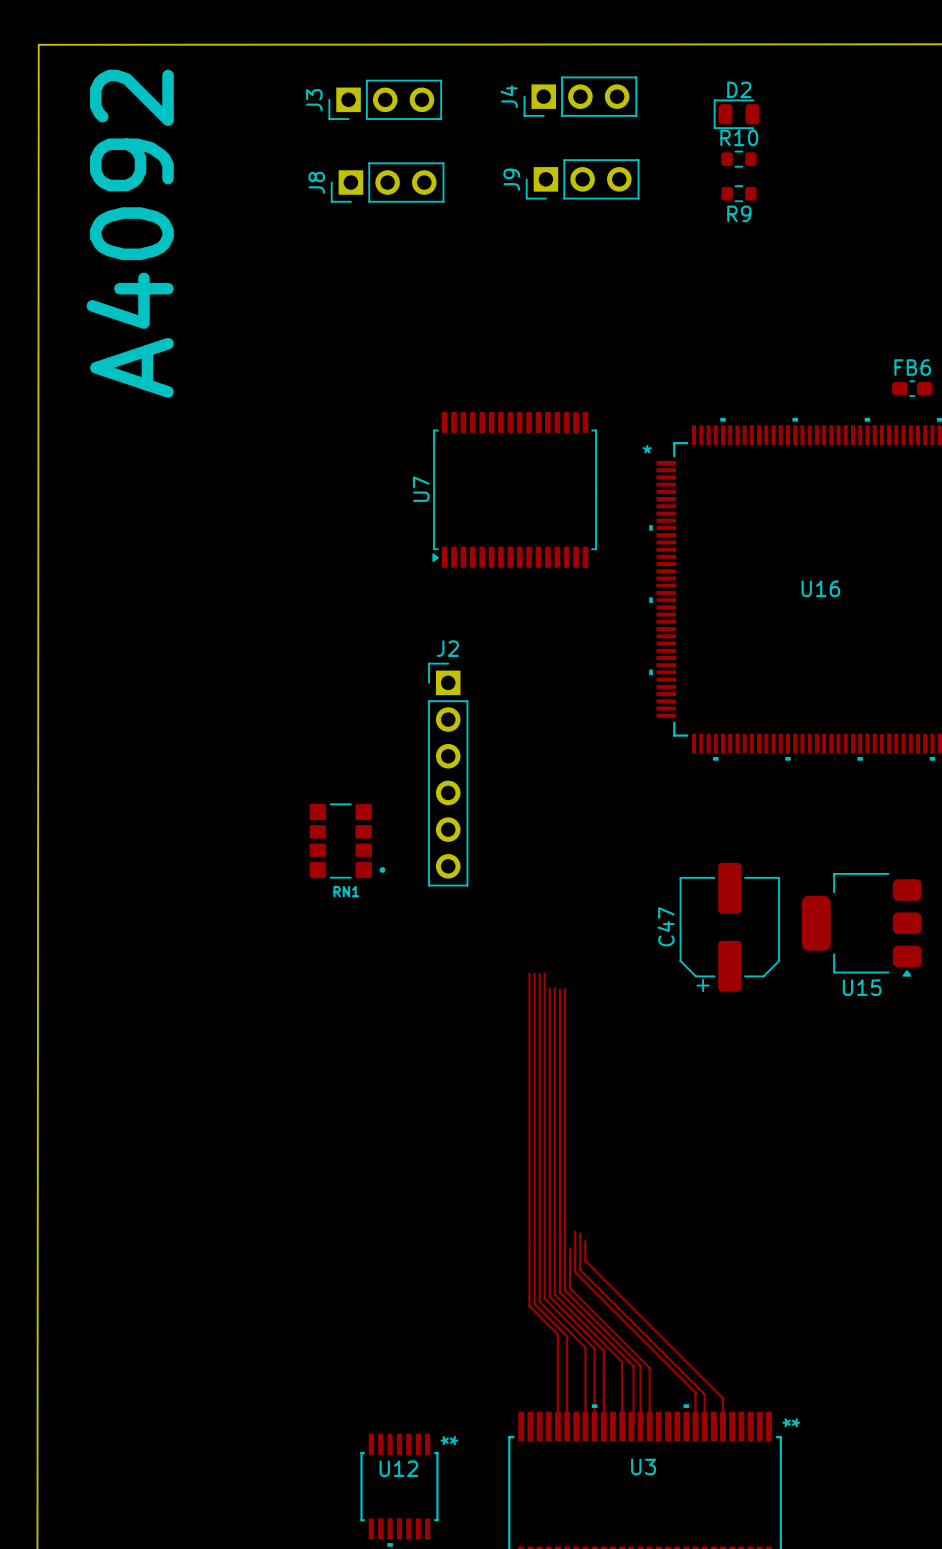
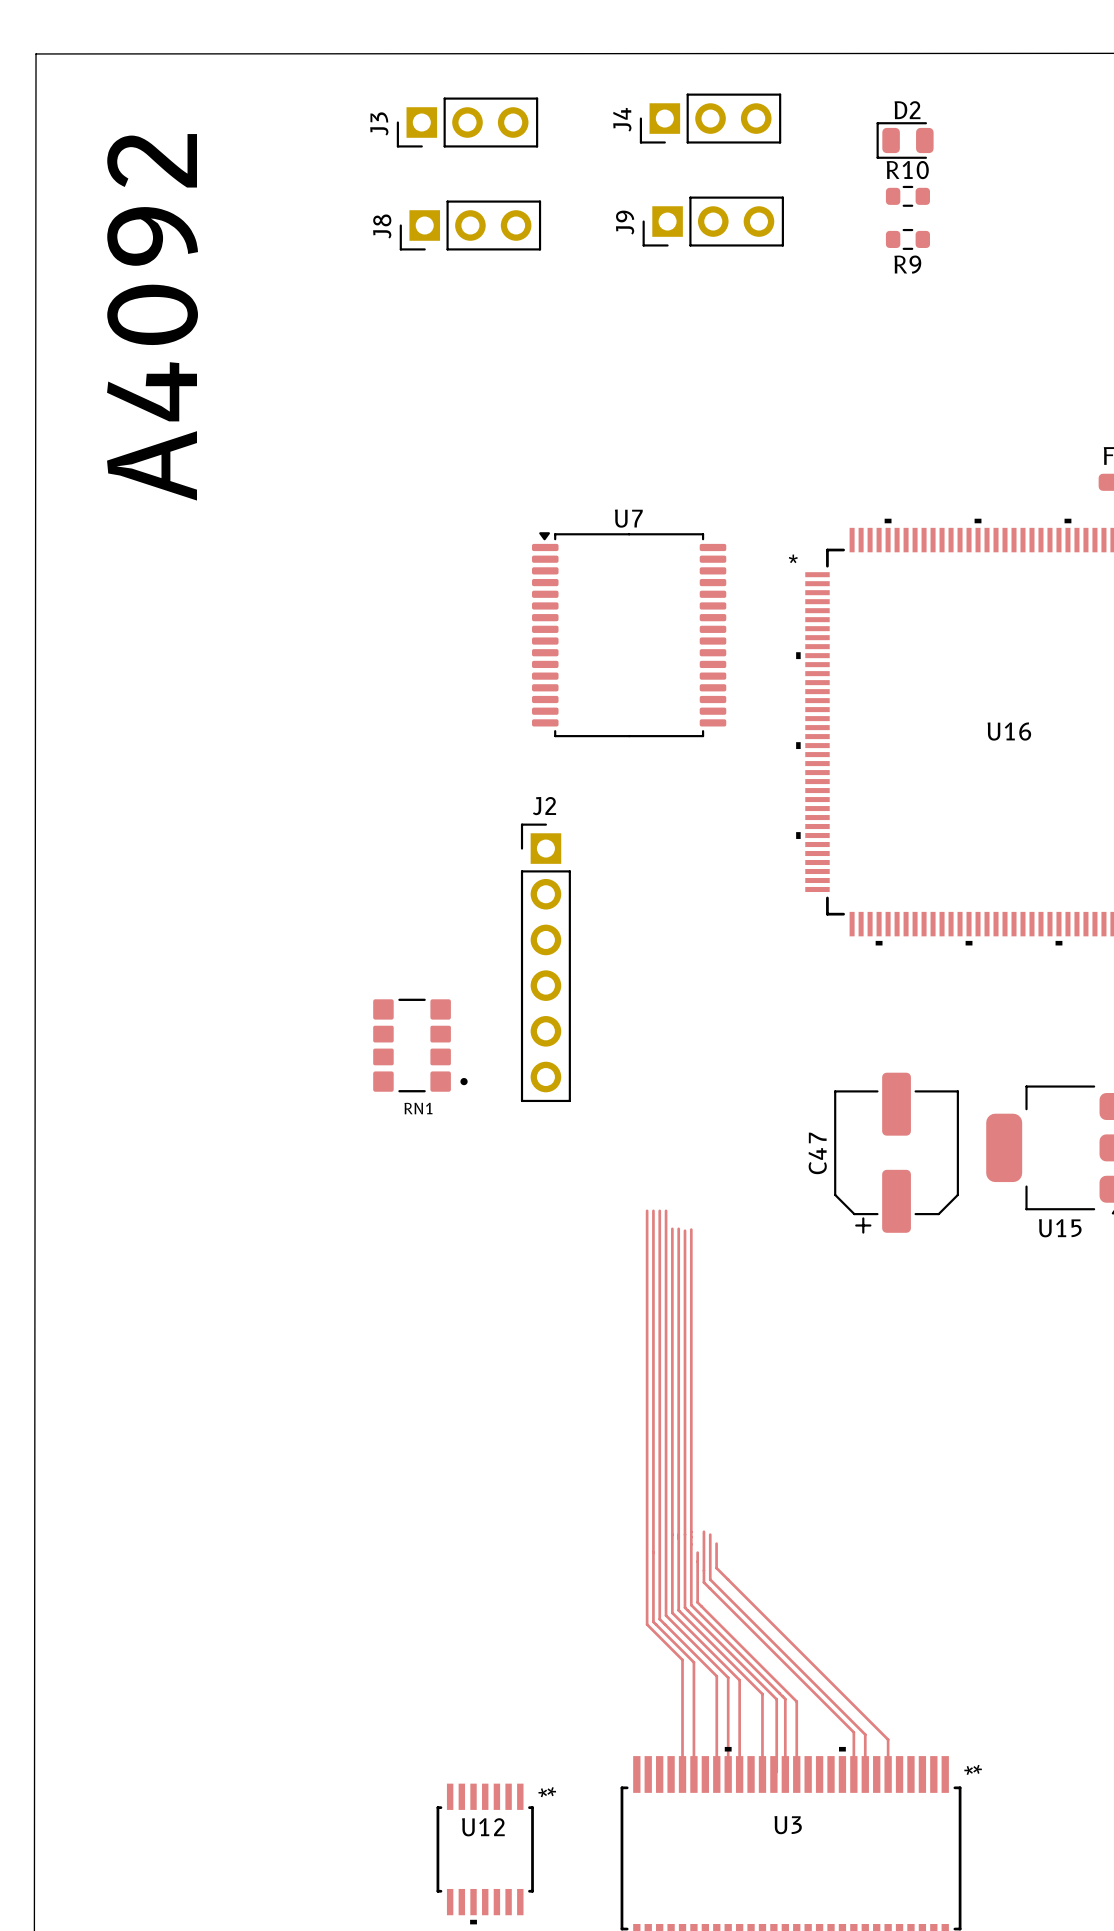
U7 rotation: 0° (514, 489) -> 90° clockwise (629, 634)

